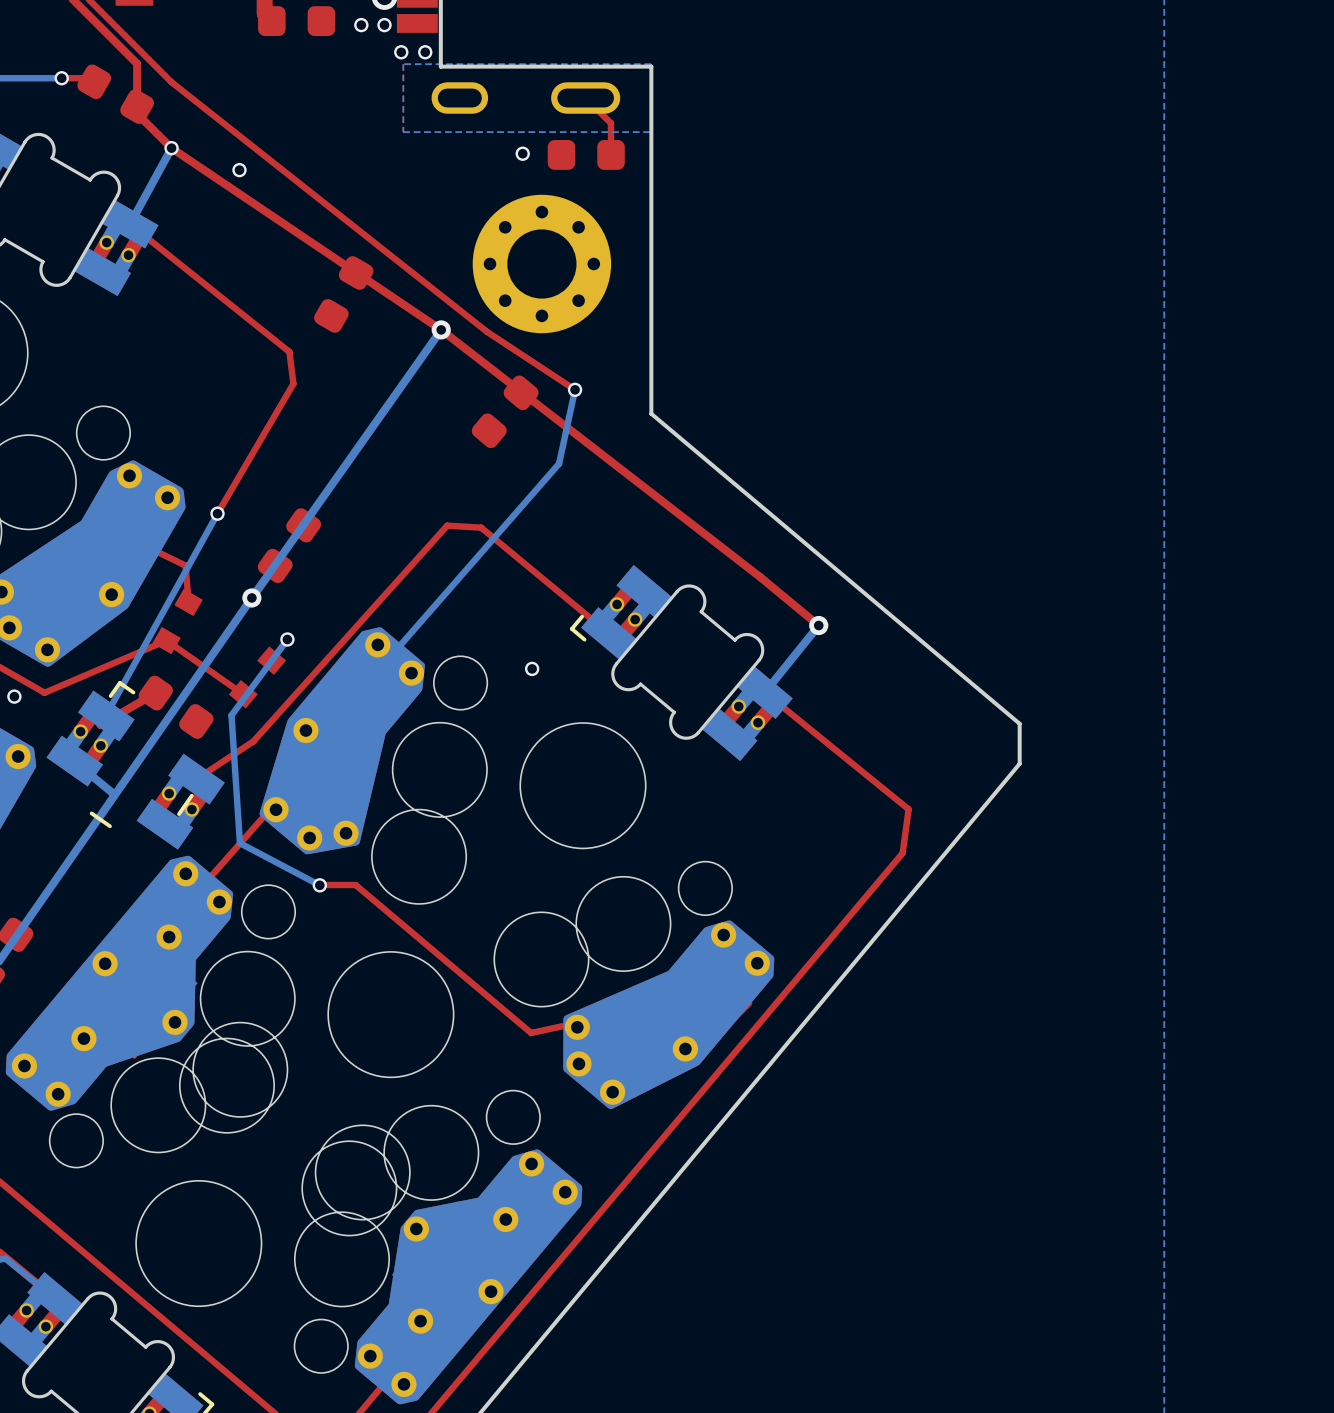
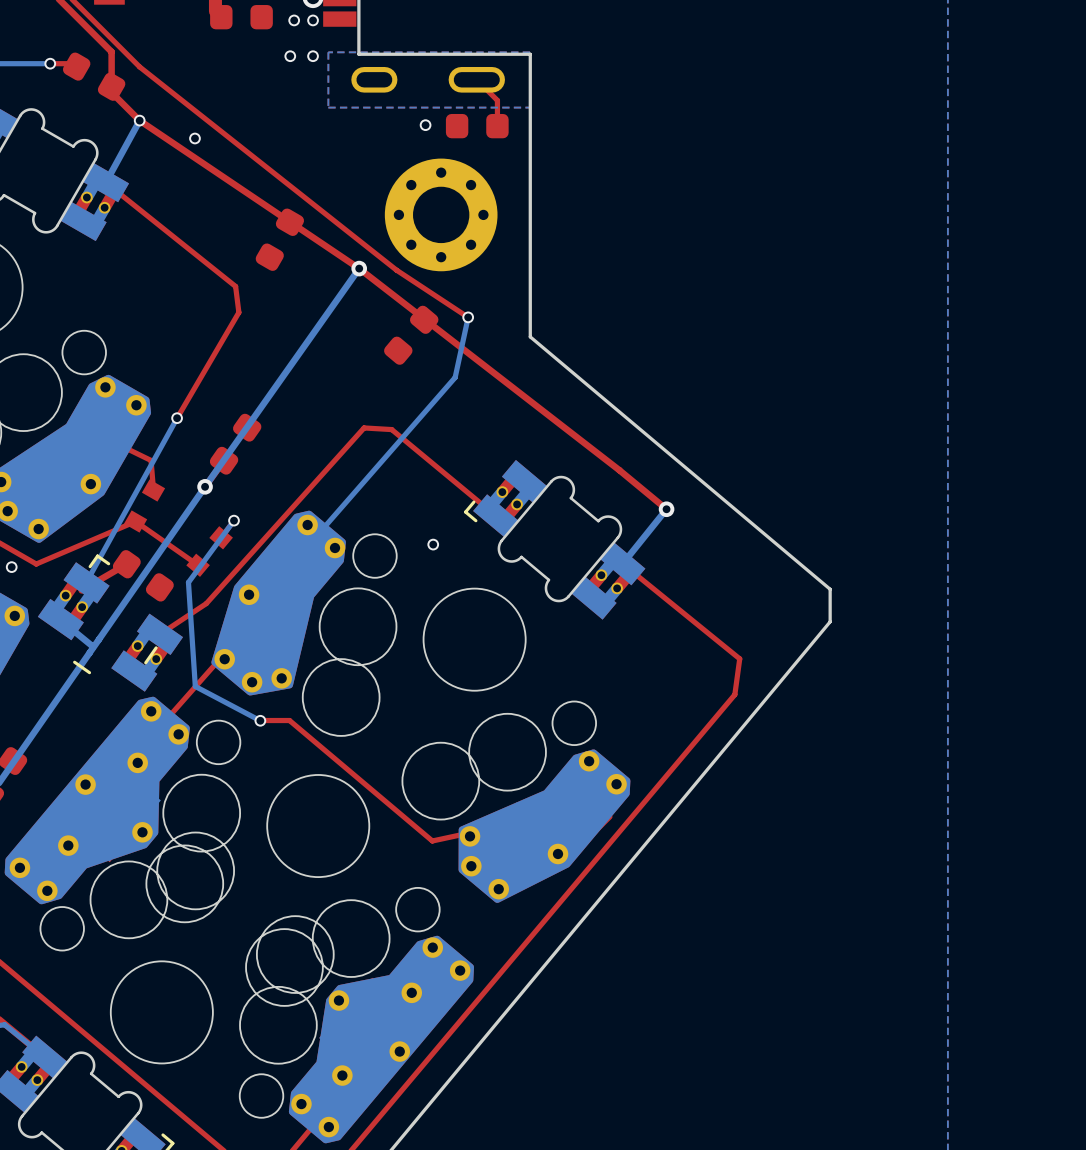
via: (401, 52) -> none
via: (425, 52) -> none
via: none -> (290, 56)
via: none -> (313, 56)

